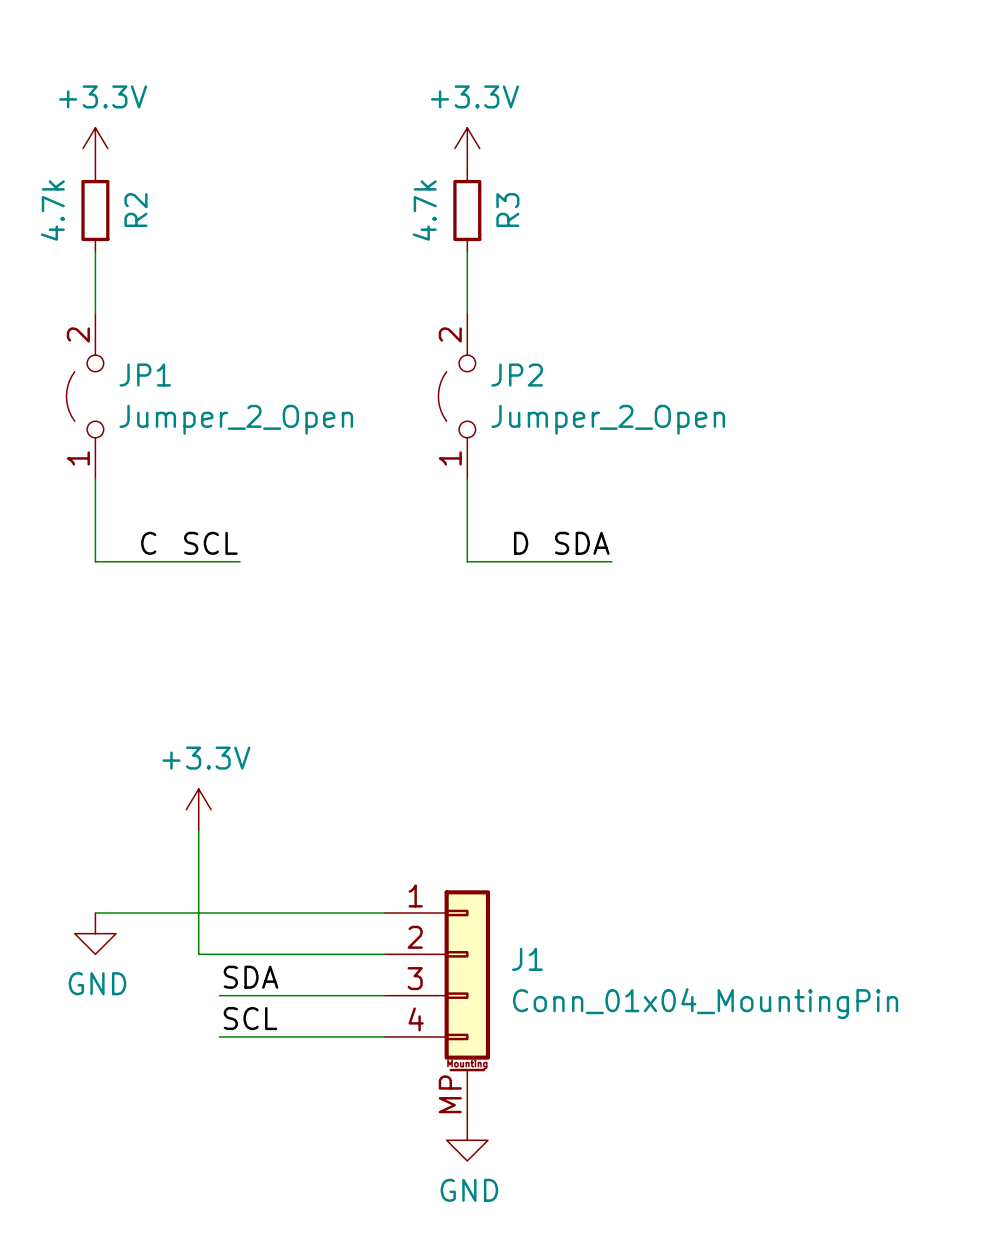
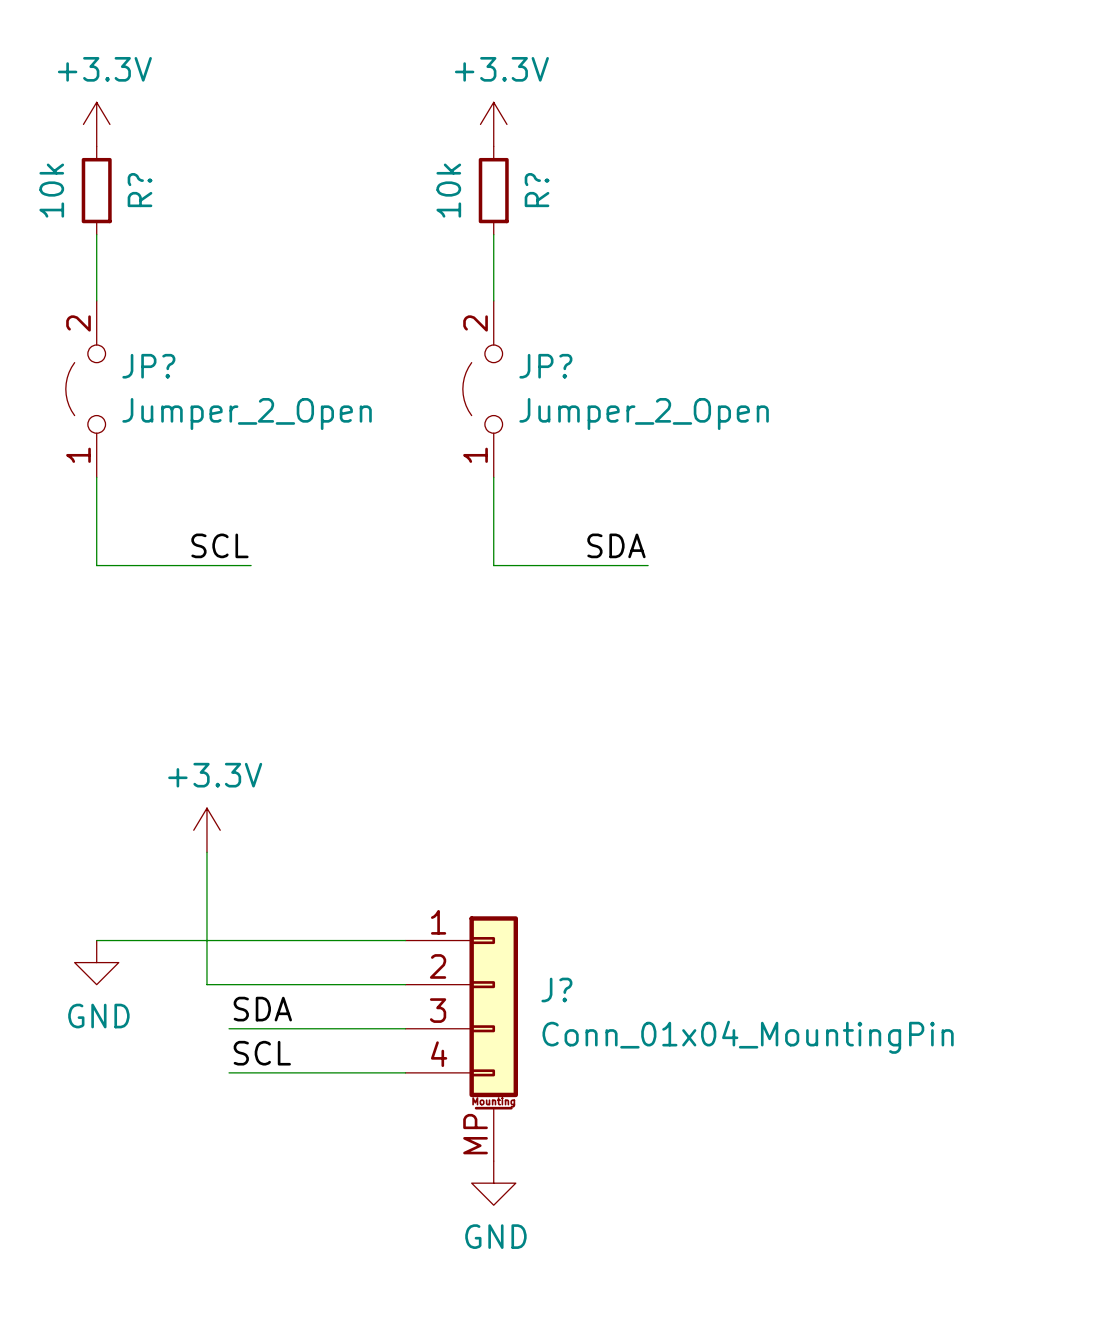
R2 value: 4.7k (52, 210) -> 10k (51, 190)
R2 name: R2 (135, 210) -> R? (139, 190)
R3 value: 4.7k (424, 210) -> 10k (448, 190)
R3 name: R3 (507, 210) -> R? (537, 190)
JP1 name: JP1 (145, 375) -> JP? (148, 366)
JP2 name: JP2 (517, 375) -> JP? (545, 366)
label: C (148, 543) -> none
label: D (521, 543) -> none
J1 name: J1 (527, 959) -> J? (556, 990)

